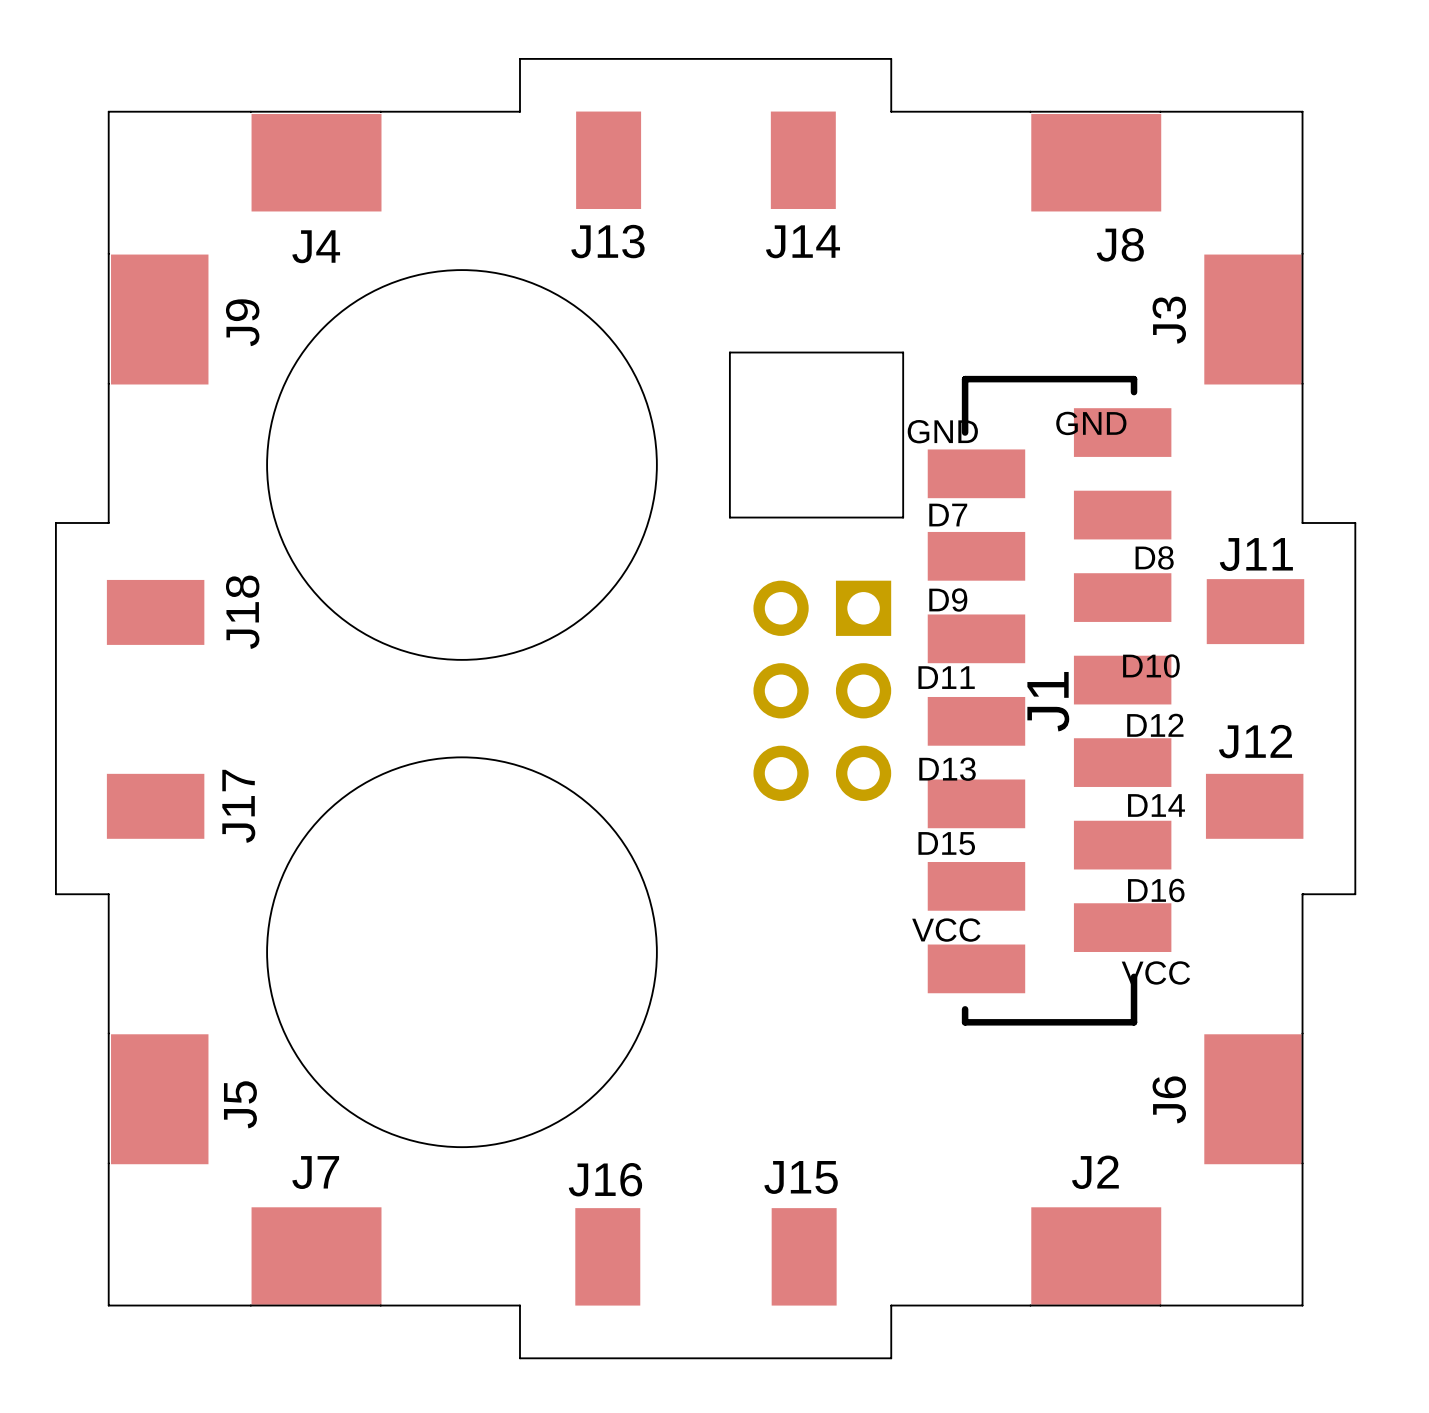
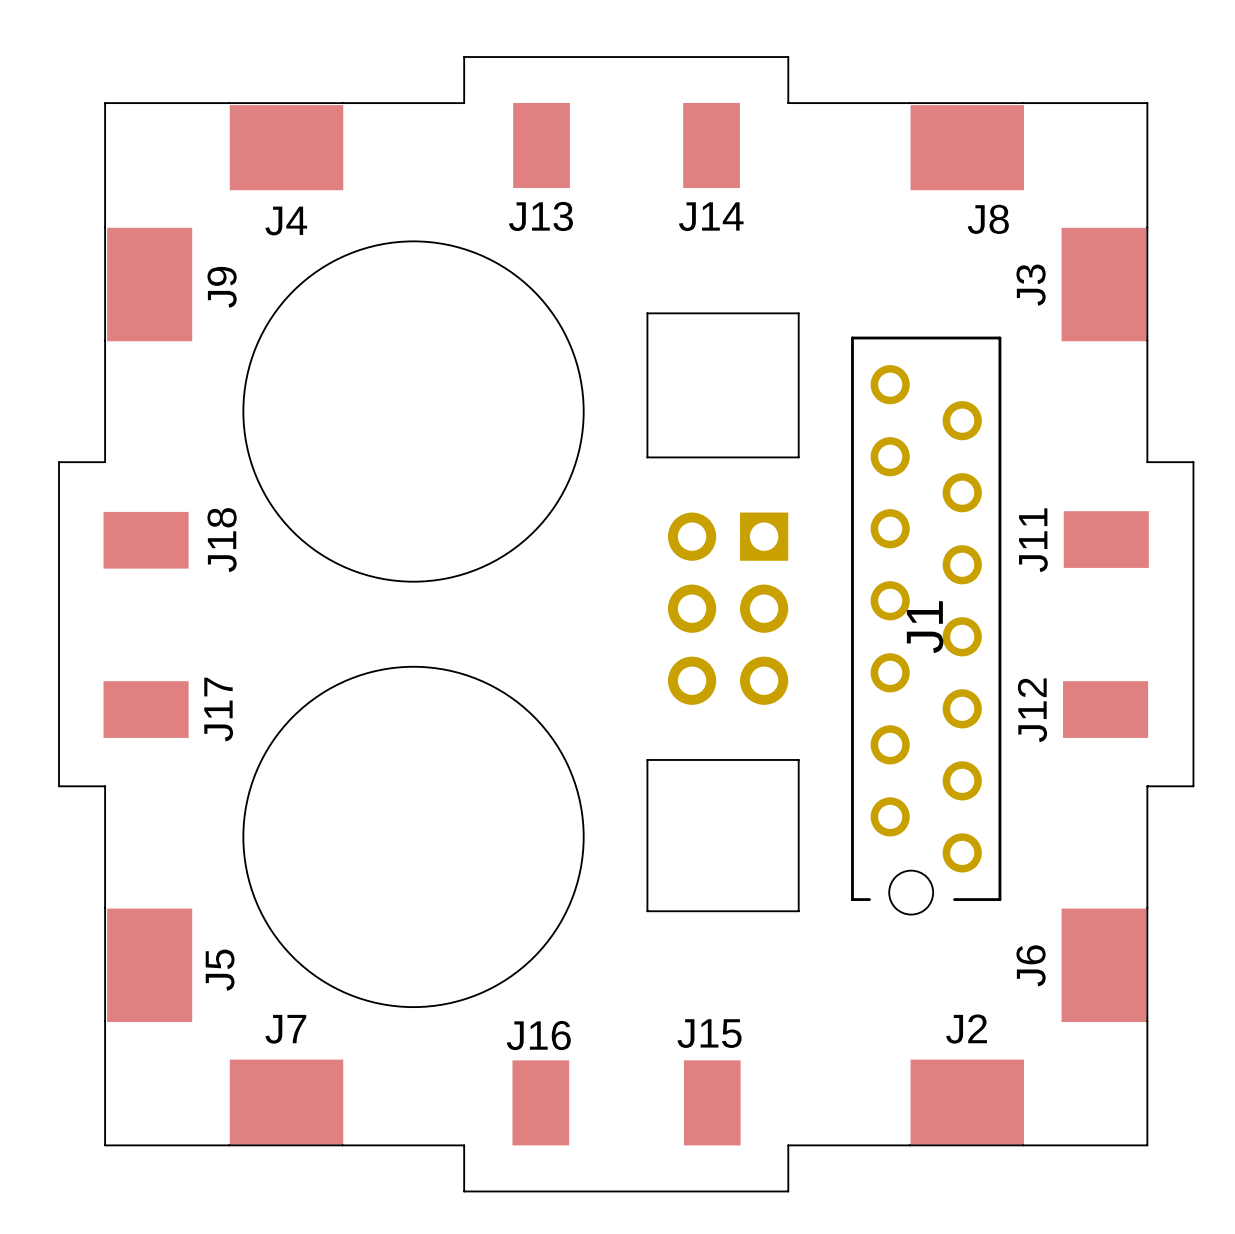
J1 footprint: [927, 375, 1172, 1026] -> [851, 336, 1002, 915]
text: GND (1091, 423) -> none
text: GND (942, 431) -> none
text: D7 (948, 515) -> none
J11 name rotation: 0° (1256, 554) -> 90° counterclockwise (1033, 540)
text: D8 (1154, 557) -> none
text: D9 (948, 600) -> none
text: D10 (1151, 666) -> none
text: D11 (946, 677) -> none
text: D12 (1155, 725) -> none
J12 name rotation: 0° (1255, 741) -> 90° counterclockwise (1032, 710)
text: D13 (947, 769) -> none
text: D14 (1156, 805) -> none
text: D15 (946, 843) -> none
board edge: none -> (647, 759) (798, 759) (798, 911) (647, 911) (647, 759)
text: D16 (1156, 890) -> none
text: VCC (946, 930) -> none
text: VCC (1155, 972) -> none

